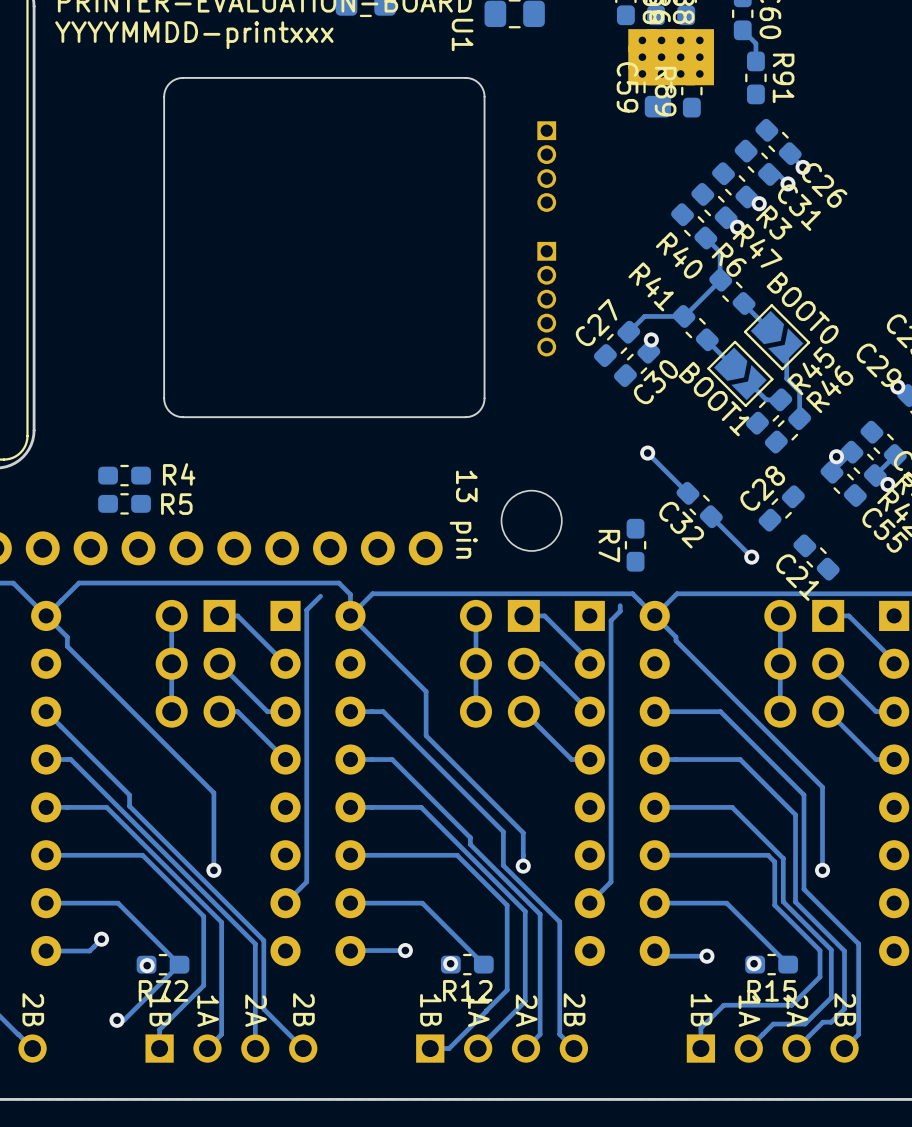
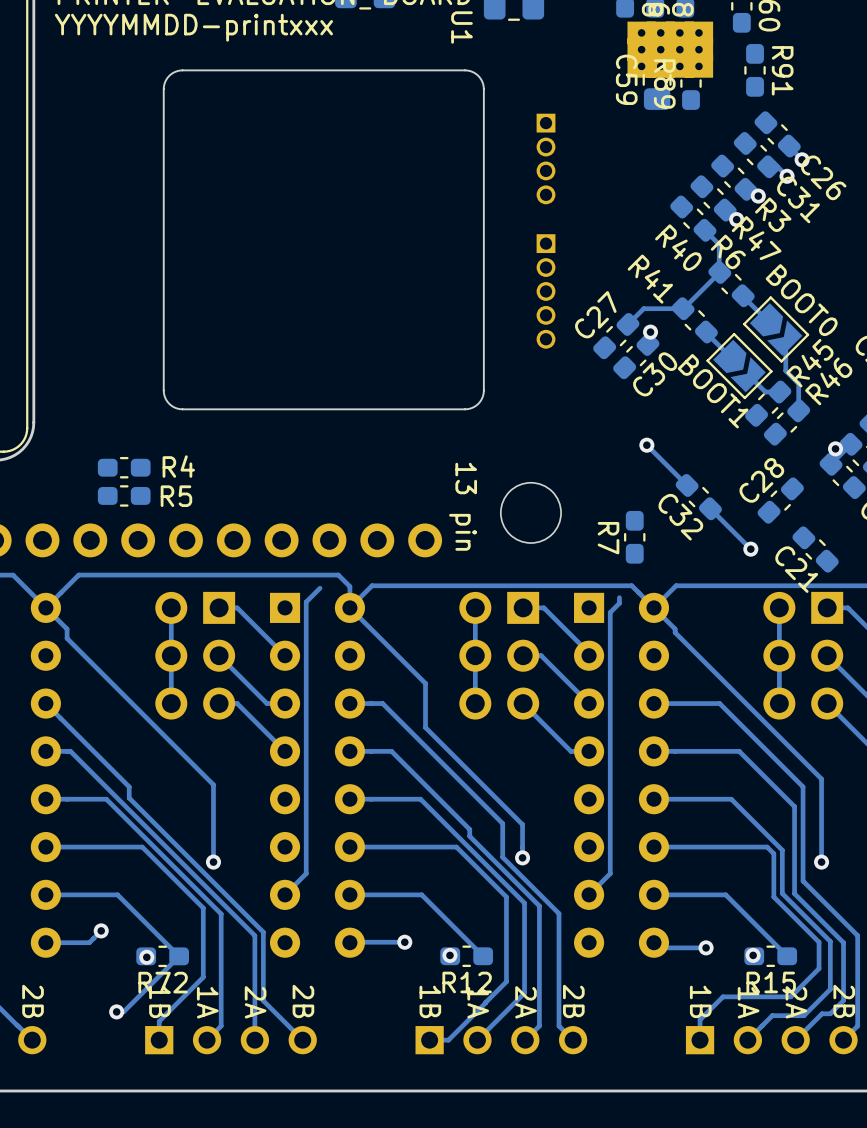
track: (742, 30) (755, 43) (755, 61) -> none

